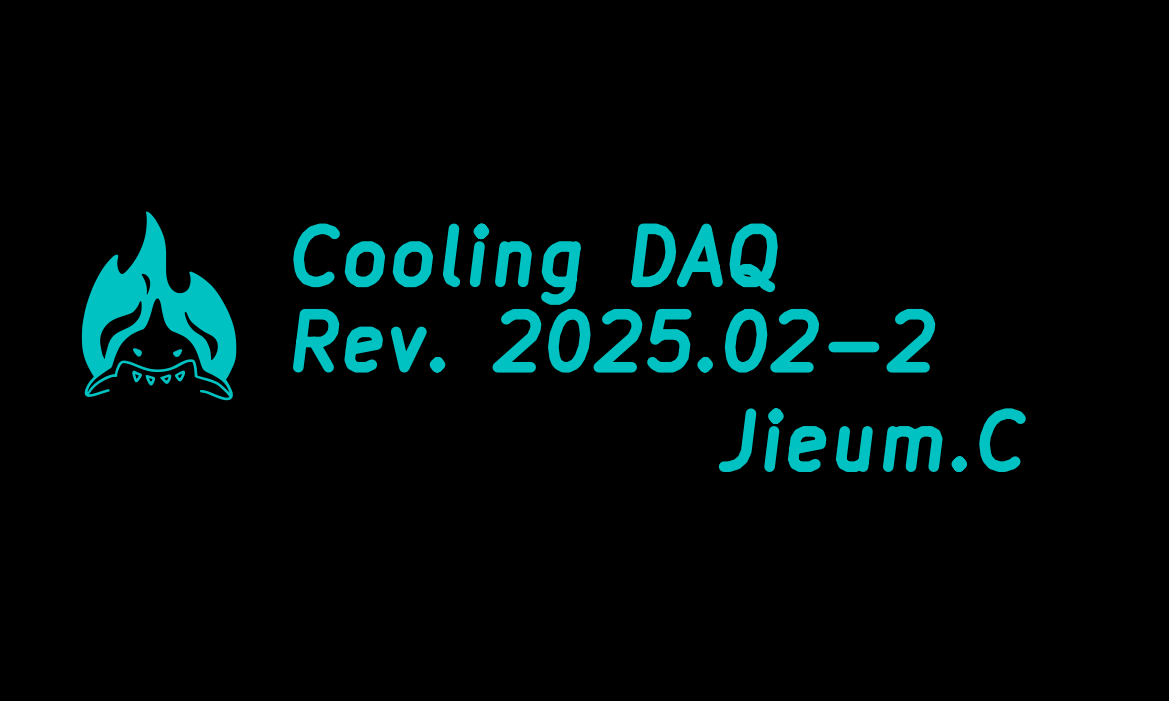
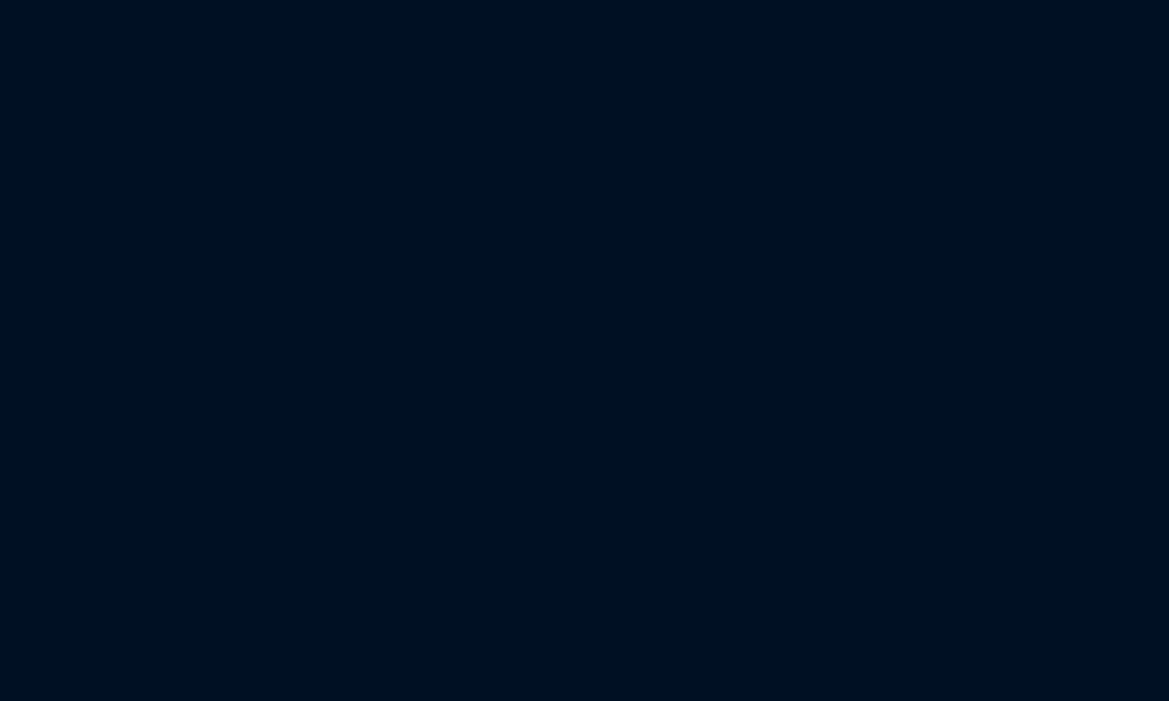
drawing: [81, 211, 237, 401] -> none
text: Cooling DAQ (535, 264) -> none
text: Rev. 2025.02-2 (614, 340) -> none
text: Jieum.C (872, 440) -> none

